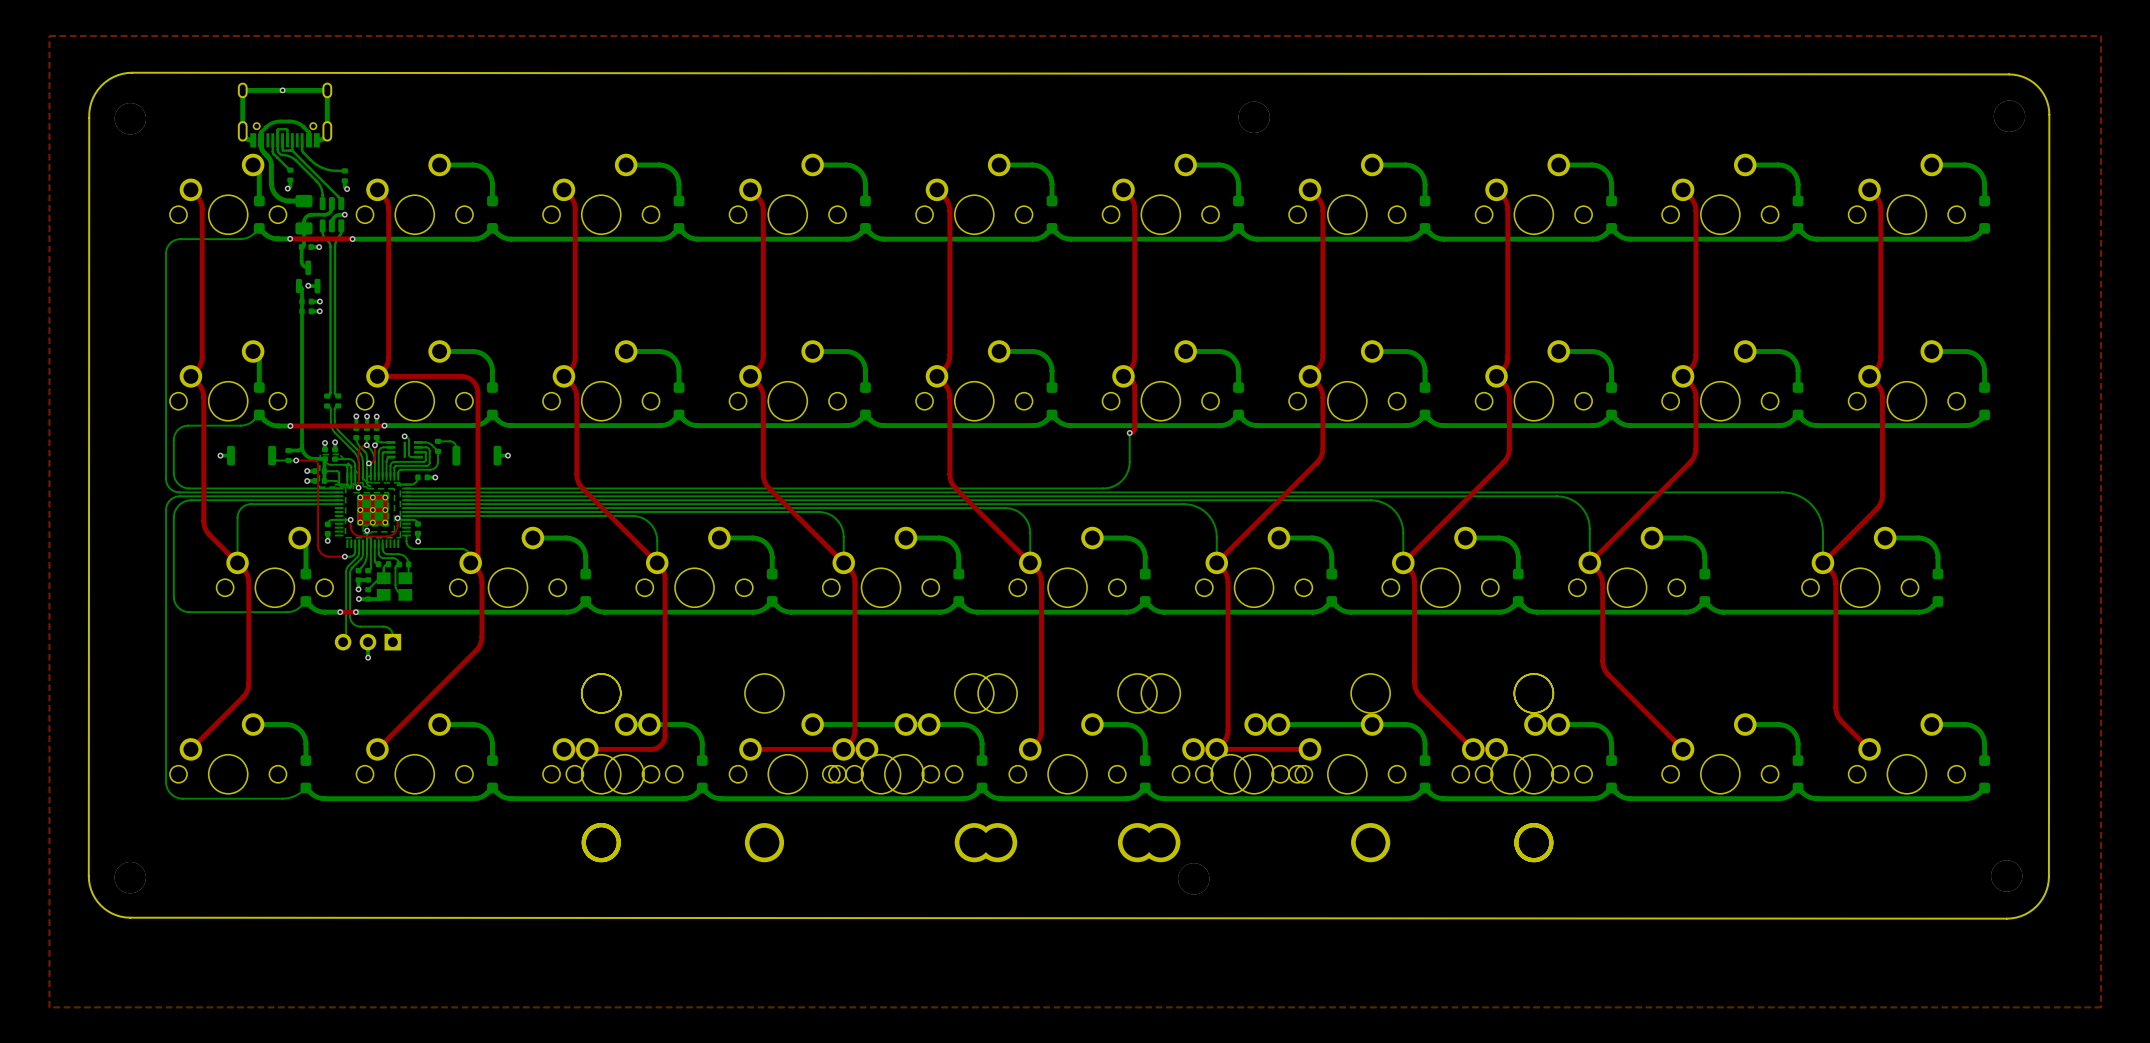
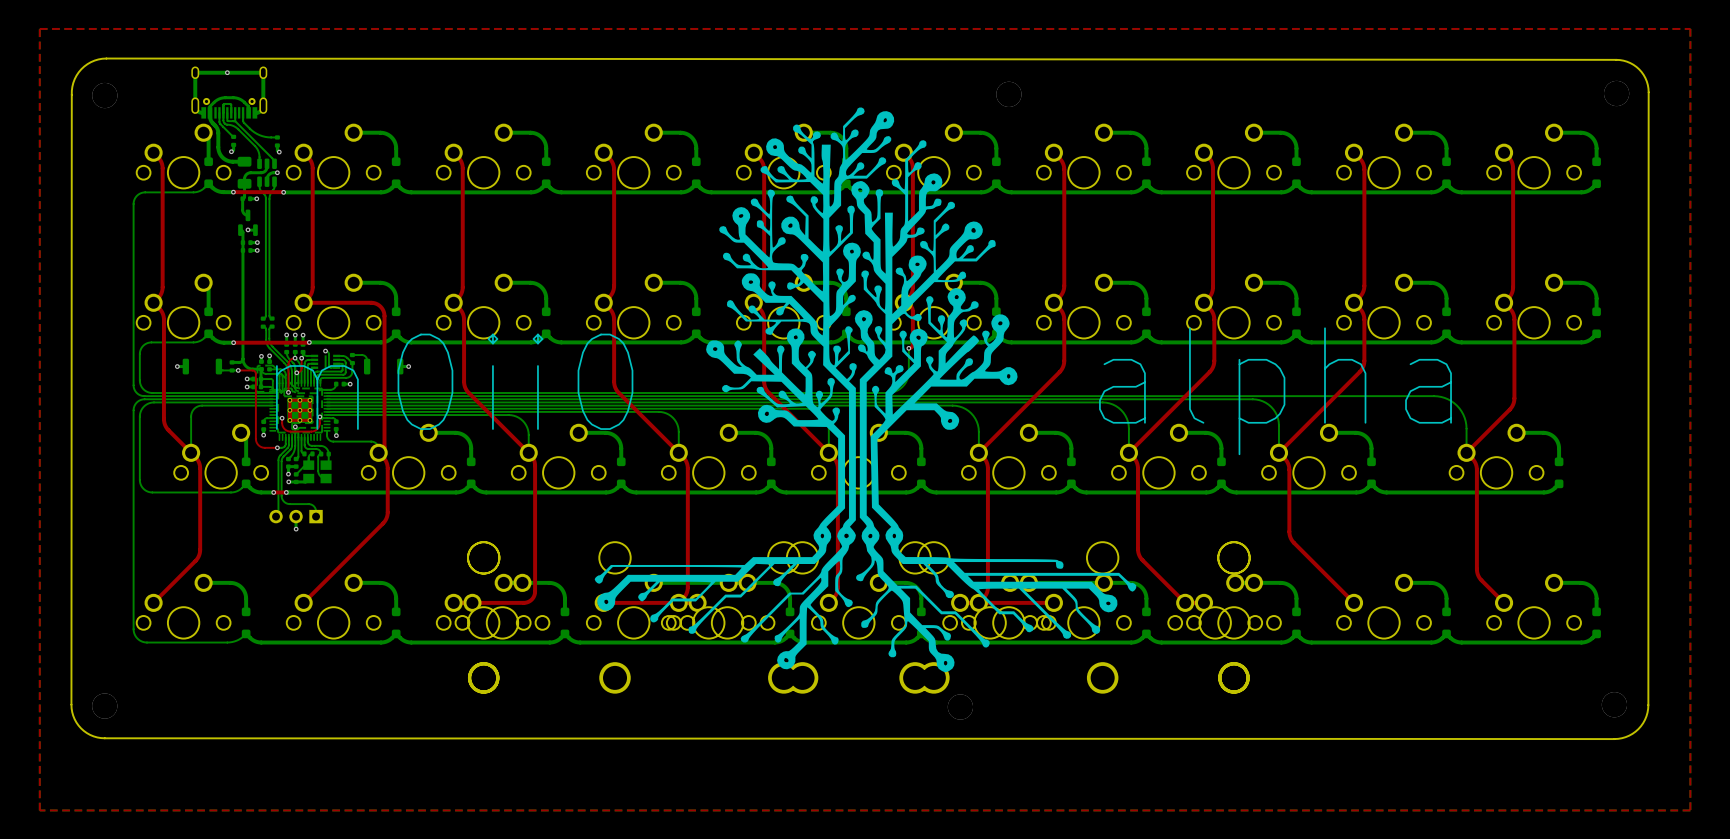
drawing: none -> [594, 107, 1137, 673]
text: none -> m0ii0 (454, 381)
text: none -> alpha (1275, 391)

